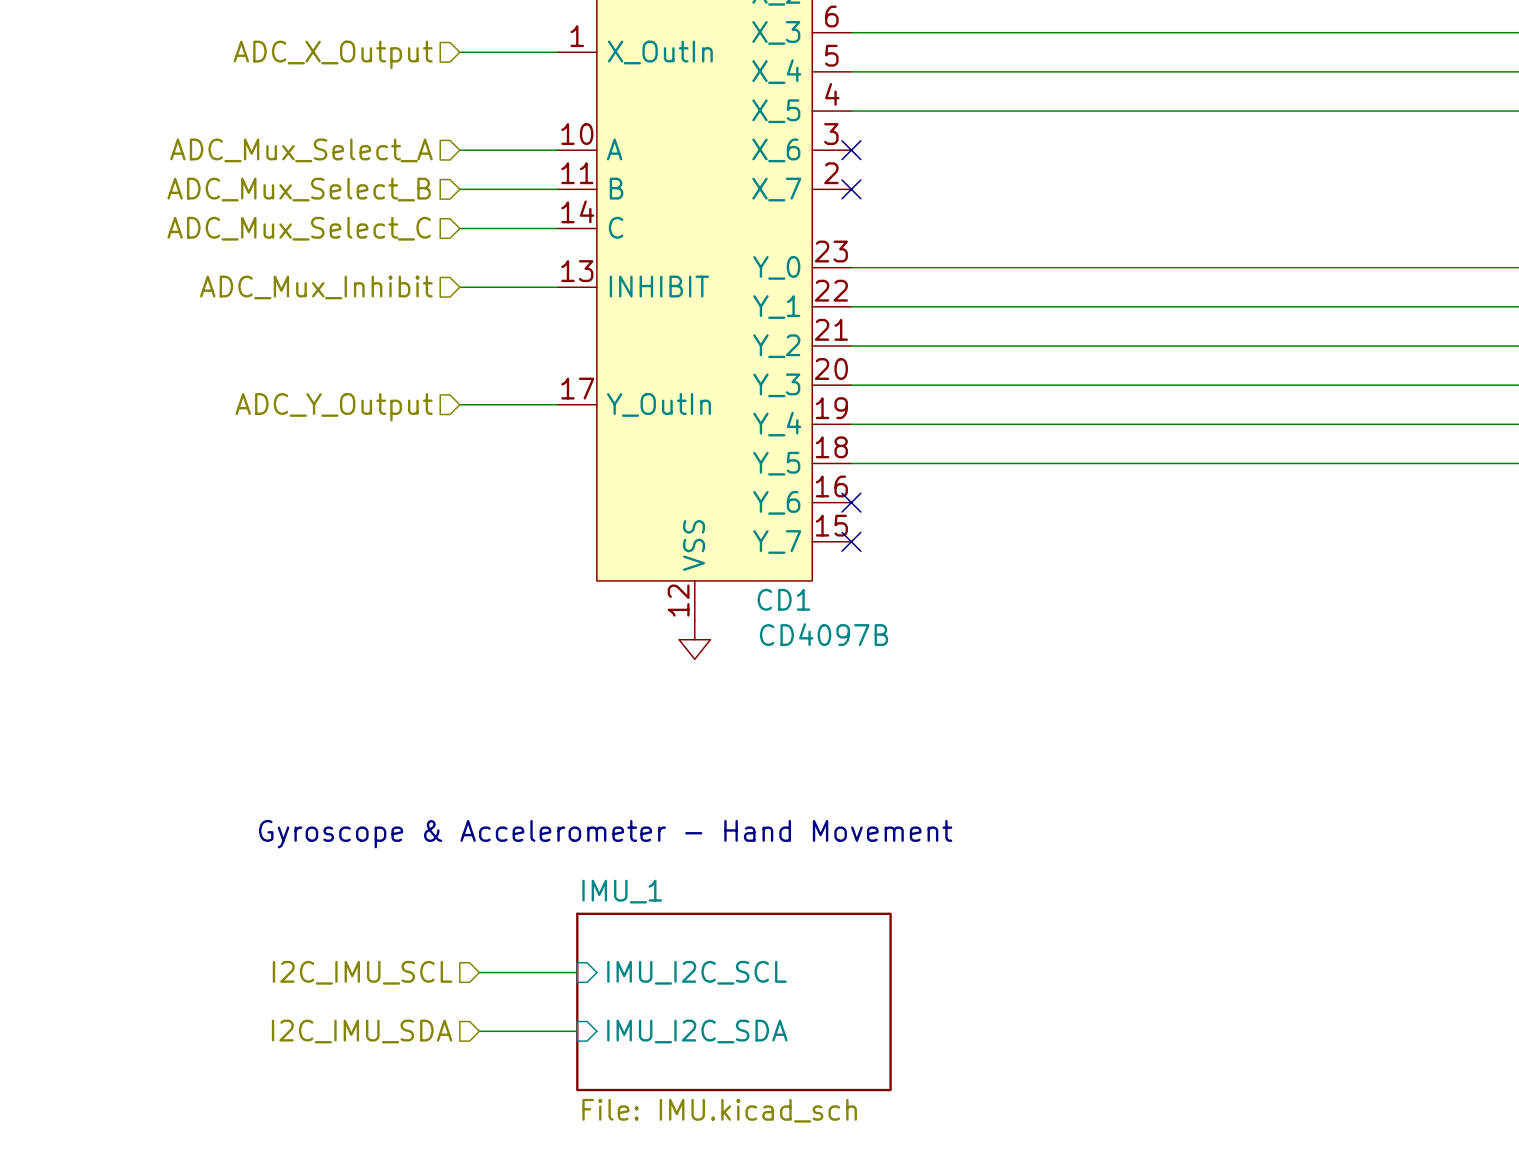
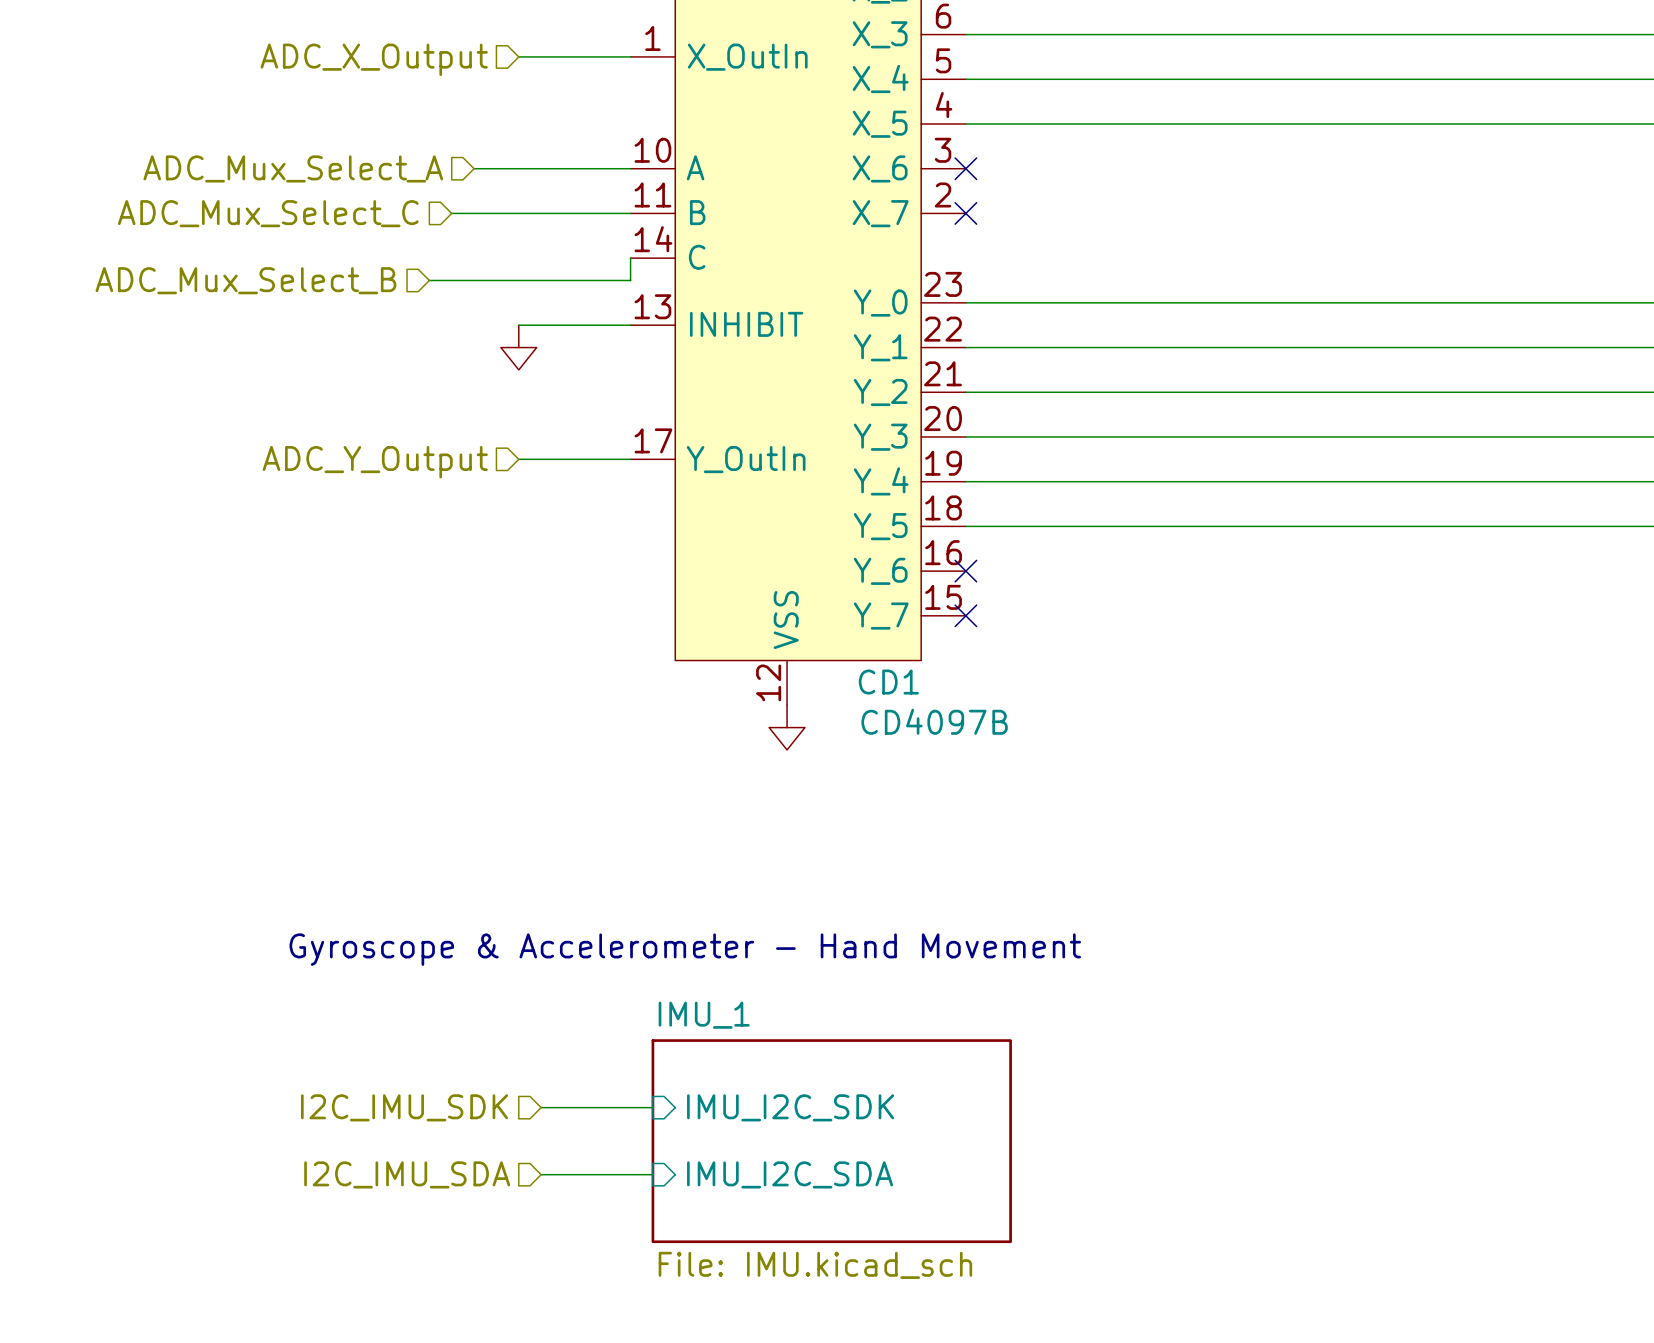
hierarchical label position: ADC_Mux_Select_A (301, 150) -> ADC_Mux_Select_A (293, 168)
wire: none -> (474, 168) (518, 168)
hierarchical label position: ADC_Mux_Select_B (299, 189) -> ADC_Mux_Select_B (245, 280)
wire: none -> (451, 213) (518, 213)
hierarchical label position: ADC_Mux_Select_C (299, 228) -> ADC_Mux_Select_C (268, 213)
wire: (459, 228) (557, 228) -> (429, 280) (630, 280) (630, 258)
hierarchical label: ADC_Mux_Inhibit (316, 287) -> none
power symbol: none -> (518, 347)
hierarchical label: I2C_IMU_SCL (362, 972) -> I2C_IMU_SDK (404, 1107)
sheet pin: IMU_I2C_SCL (696, 972) -> IMU_I2C_SDK (790, 1107)

